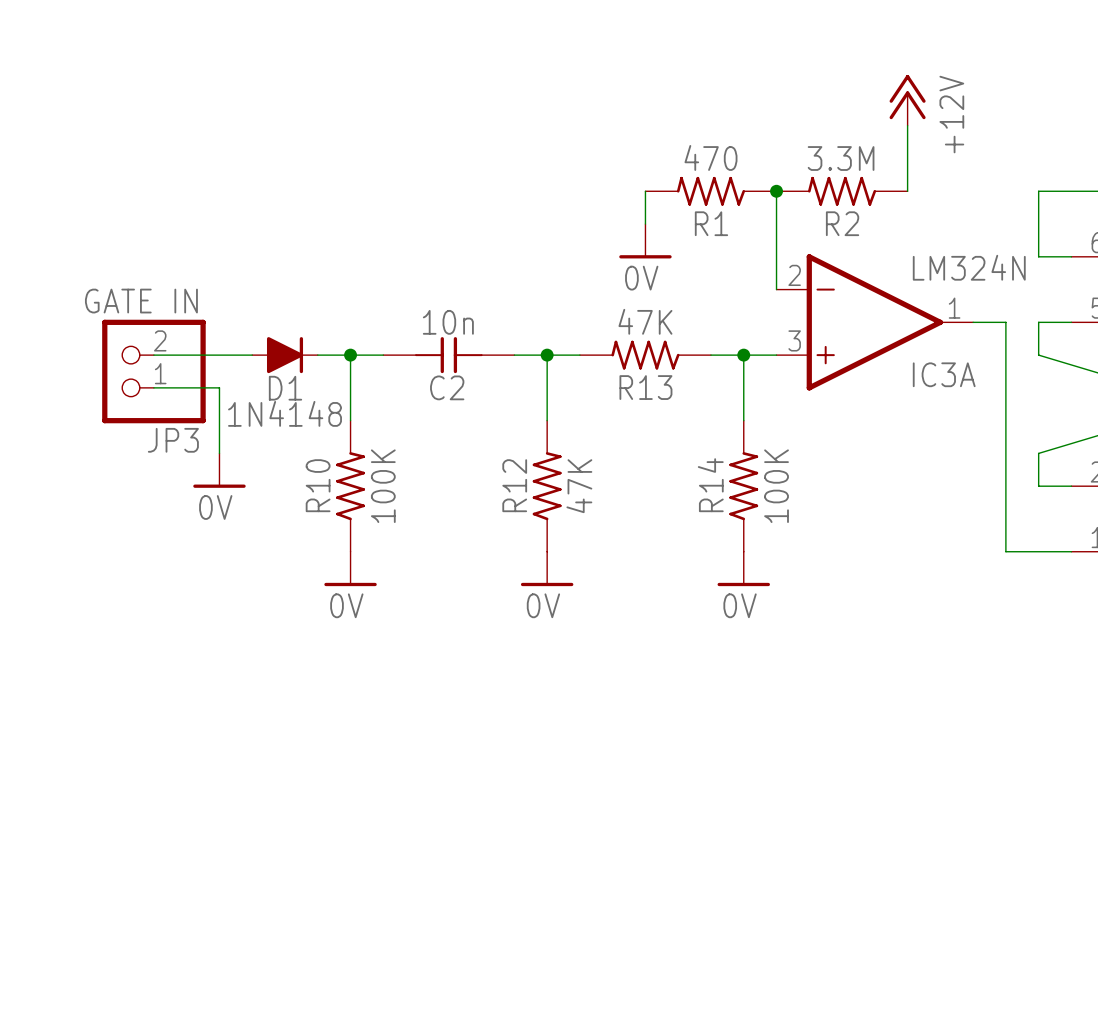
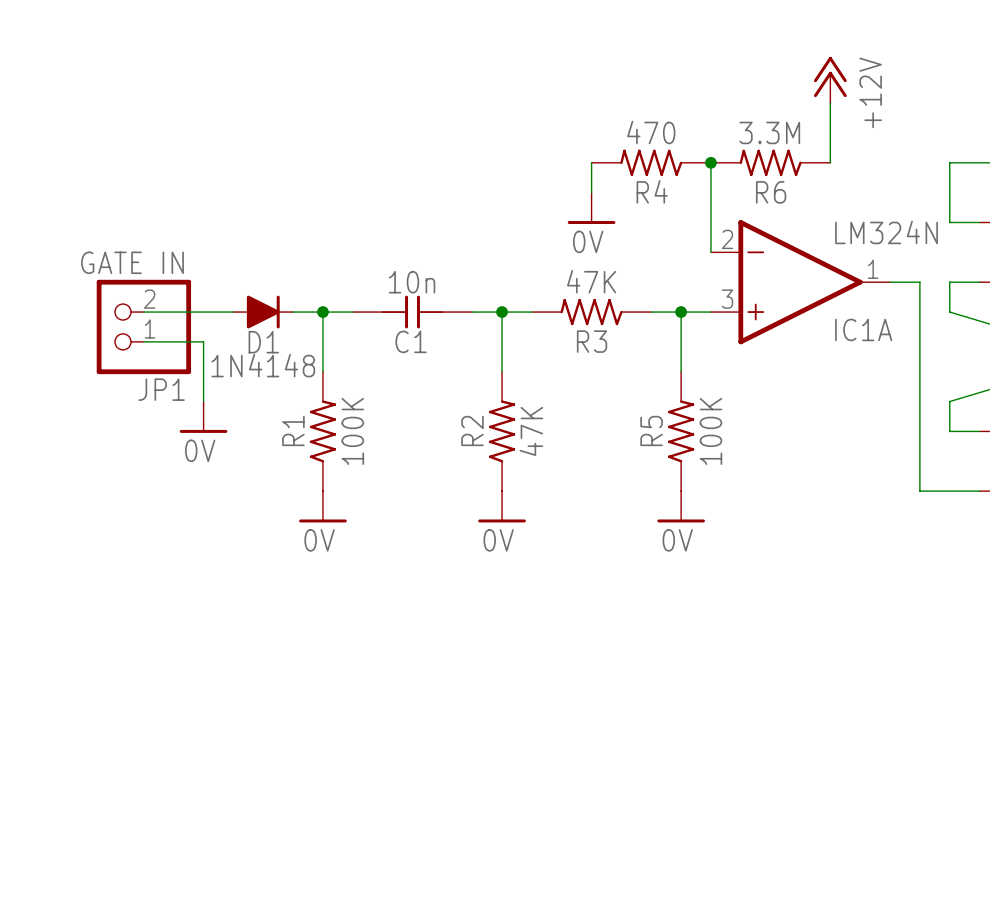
R1 name: R1 (711, 223) -> R4 (652, 191)
R2 name: R2 (842, 223) -> R6 (771, 192)
IC3A name: IC3A (944, 374) -> IC1A (863, 329)
C2 name: C2 (447, 387) -> C1 (411, 341)
R13 name: R13 (645, 387) -> R3 (592, 341)
JP3 name: JP3 (173, 440) -> JP1 (161, 389)
R10 name: R10 (318, 485) -> R1 (293, 430)
R12 name: R12 (514, 485) -> R2 (472, 430)
R14 name: R14 (710, 485) -> R5 (651, 430)

